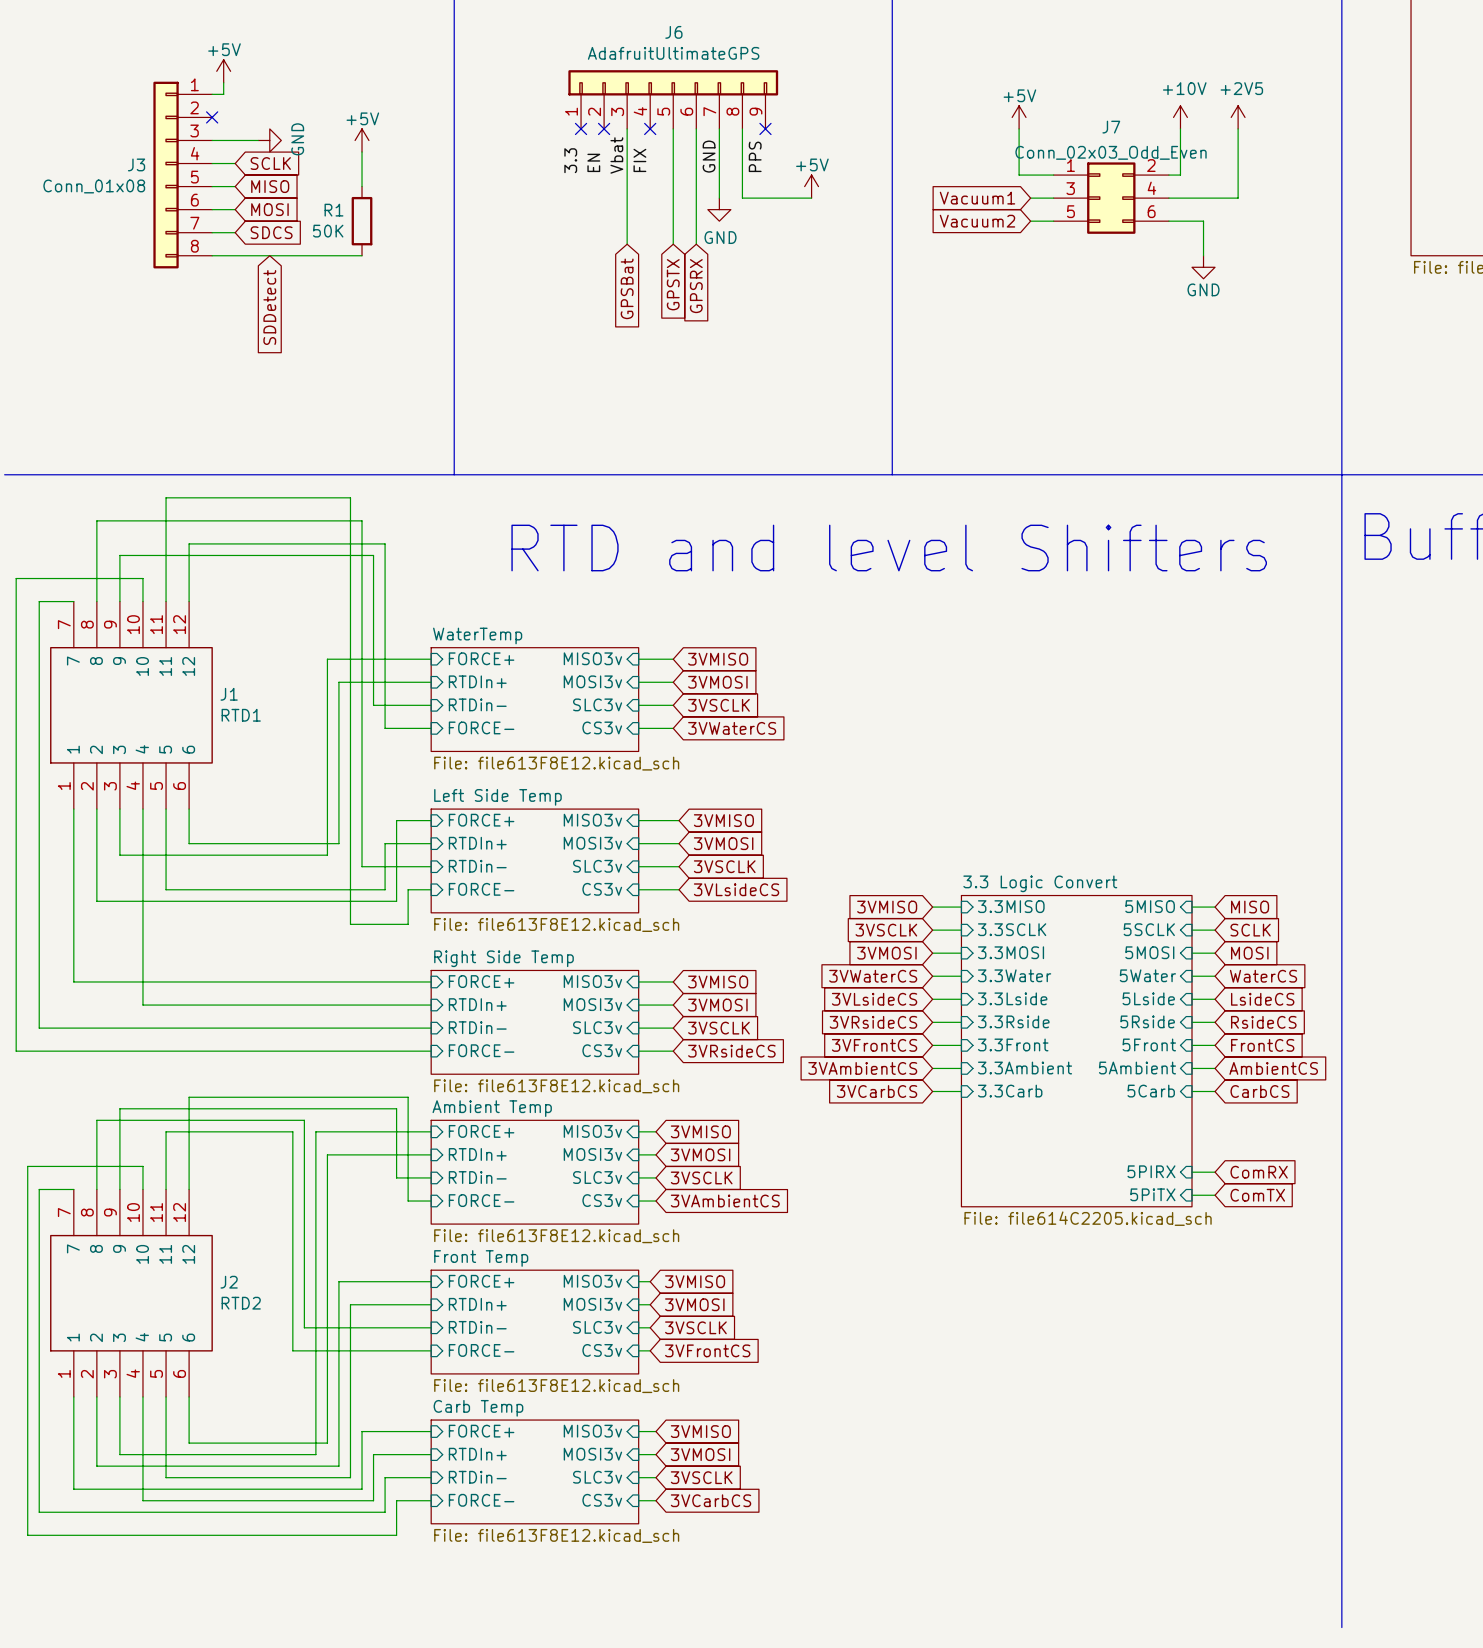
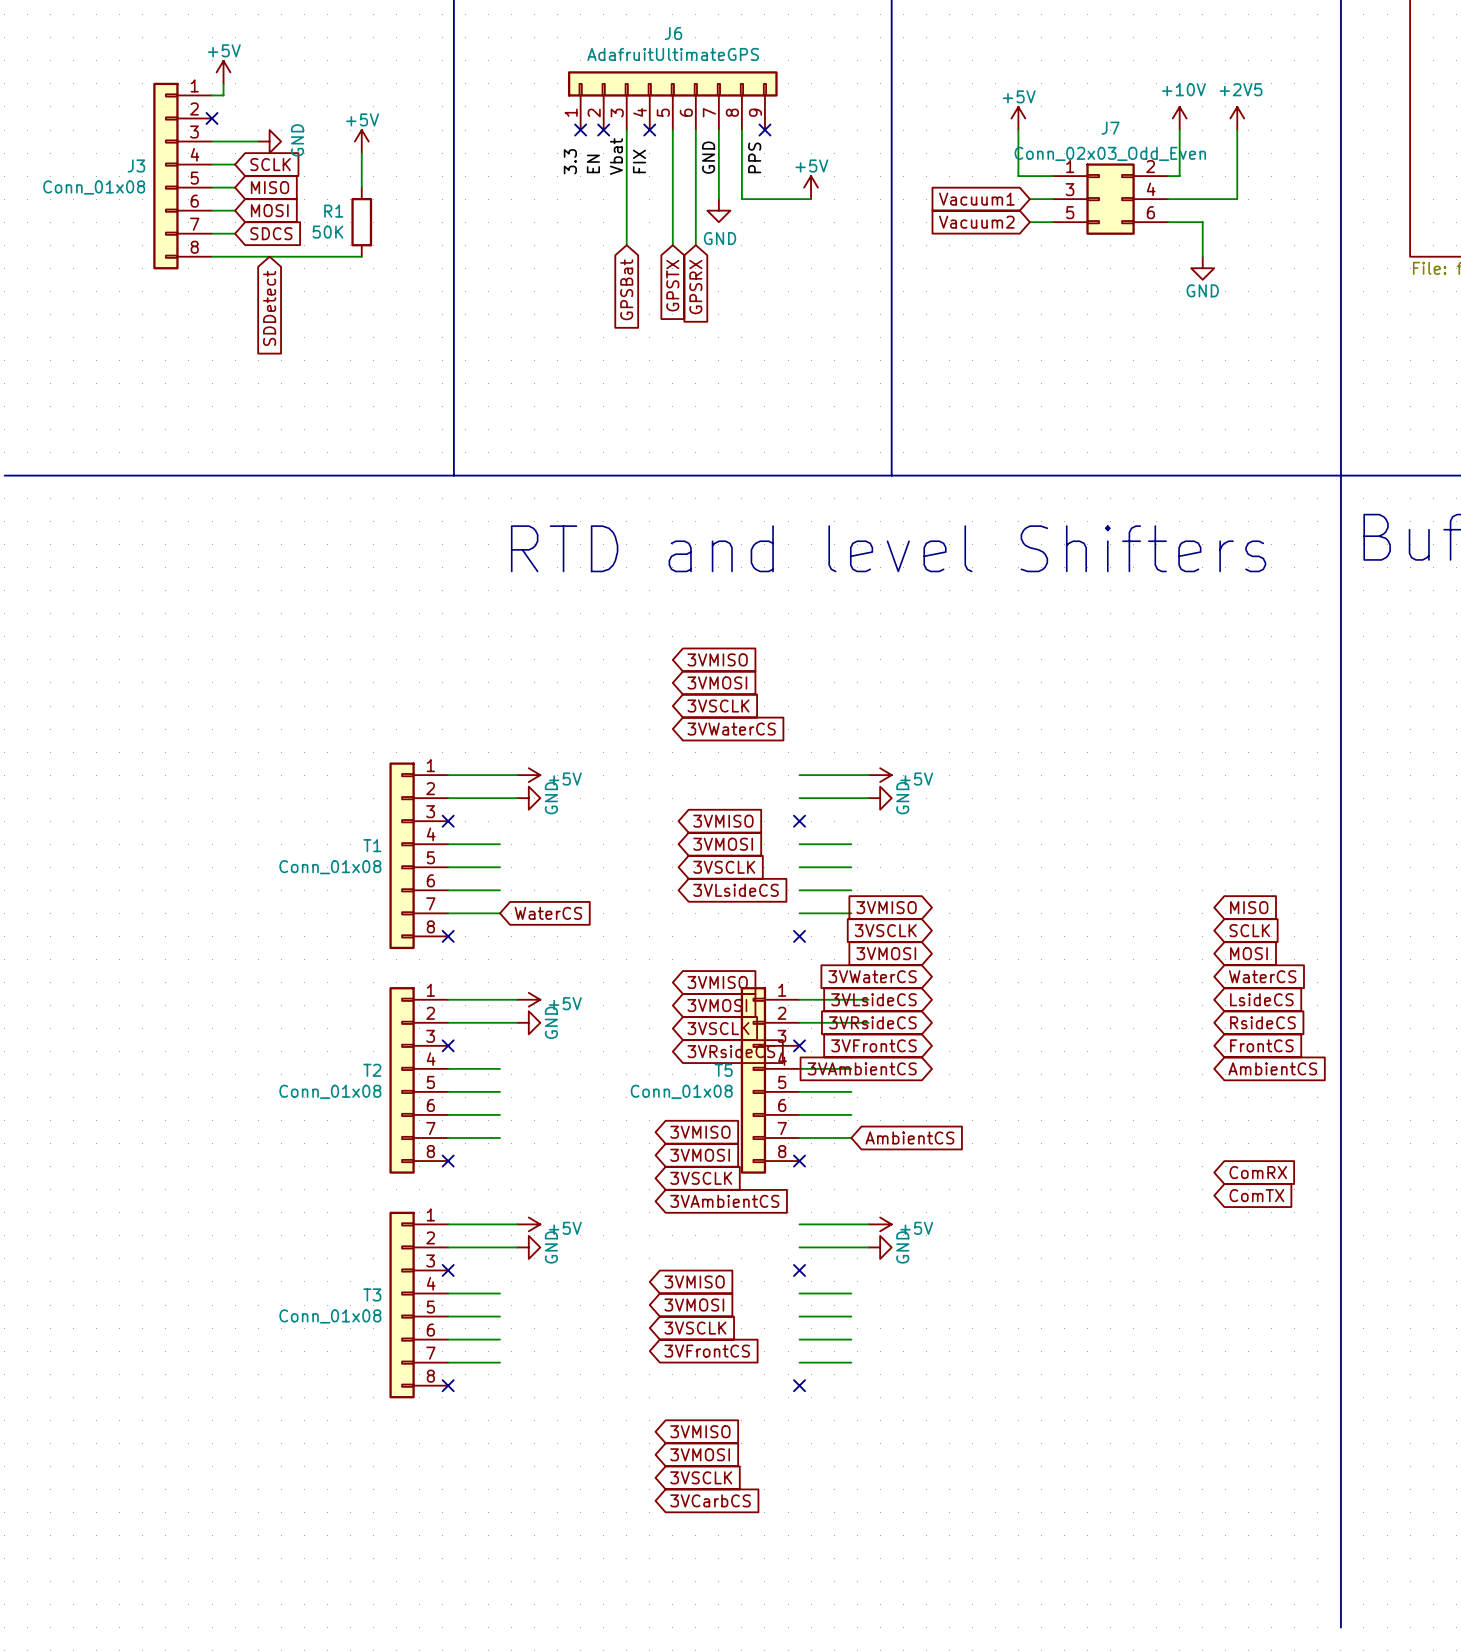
wire: (73, 601) (39, 601) (39, 1028) (431, 1028) -> none
wire: (96, 601) (96, 520) (362, 520) (362, 866) (431, 866) -> none
wire: (119, 601) (119, 555) (373, 555) (373, 705) (431, 705) -> none
wire: (142, 601) (142, 578) (16, 578) (16, 1051) (431, 1051) -> none
wire: (166, 601) (166, 497) (350, 497) (350, 924) (408, 924) (408, 889) (431, 889) -> none
wire: (189, 601) (189, 543) (385, 543) (385, 728) (431, 728) -> none
sheet pin: FORCE+ (481, 658) -> none
sheet pin: MISO3v (592, 658) -> none
wire: (431, 659) (327, 659) (327, 855) (119, 855) (119, 809) -> none
wire: (638, 659) (673, 659) -> none
sheet pin: RTDIn+ (477, 681) -> none
sheet pin: MOSI3v (592, 681) -> none
wire: (431, 682) (338, 682) (338, 843) (189, 843) (189, 809) -> none
wire: (638, 682) (673, 682) -> none
sheet WaterTemp: File: file613F8E12.kicad_sch (534, 699) -> none
sheet pin: RTDin- (477, 704) -> none
sheet pin: SLC3v (597, 704) -> none
J1: RTD1 (131, 705) -> none
wire: (638, 705) (673, 705) -> none
sheet pin: FORCE- (481, 727) -> none
sheet pin: CS3v (602, 727) -> none
wire: (638, 728) (673, 728) -> none
wire: none -> (448, 775) (517, 775)
power symbol: none -> +5V (528, 775)
wire: none -> (799, 775) (868, 775)
power symbol: none -> +5V (880, 775)
wire: none -> (448, 798) (517, 798)
power symbol: none -> GND (528, 798)
wire: none -> (799, 798) (868, 798)
power symbol: none -> GND (880, 798)
wire: (73, 809) (73, 981) (431, 981) -> none
wire: (96, 809) (96, 901) (396, 901) (396, 820) (431, 820) -> none
wire: (142, 809) (142, 1005) (431, 1005) -> none
wire: (166, 809) (166, 889) (385, 889) (385, 843) (431, 843) -> none
no-connect mark: none -> (448, 821)
sheet pin: FORCE+ (481, 820) -> none
sheet pin: MISO3v (592, 820) -> none
wire: (638, 820) (679, 820) -> none
no-connect mark: none -> (799, 821)
wire: none -> (448, 844) (500, 844)
sheet pin: RTDIn+ (477, 843) -> none
sheet pin: MOSI3v (592, 843) -> none
wire: (638, 843) (679, 843) -> none
wire: none -> (799, 844) (851, 844)
T1: none -> Conn_01x08 (418, 855)
sheet Left Side Temp: File: file613F8E12.kicad_sch (534, 860) -> none
wire: none -> (448, 867) (500, 867)
sheet pin: RTDin- (477, 866) -> none
sheet pin: SLC3v (597, 866) -> none
wire: (638, 866) (679, 866) -> none
wire: none -> (799, 867) (851, 867)
wire: none -> (448, 890) (500, 890)
sheet pin: FORCE- (481, 889) -> none
sheet pin: CS3v (602, 889) -> none
wire: (638, 889) (679, 889) -> none
wire: none -> (799, 890) (851, 890)
sheet pin: 3.3MISO (1011, 906) -> none
sheet pin: 5MISO (1150, 906) -> none
wire: (932, 907) (961, 907) -> none
wire: (1191, 907) (1215, 907) -> none
global label: none -> WaterCS (548, 913)
wire: none -> (799, 913) (851, 913)
sheet pin: 3.3SCLK (1012, 929) -> none
sheet pin: 5SCLK (1149, 929) -> none
wire: (932, 930) (961, 930) -> none
wire: (1191, 930) (1215, 930) -> none
no-connect mark: none -> (448, 936)
no-connect mark: none -> (799, 936)
sheet pin: 3.3MOSI (1011, 952) -> none
sheet pin: 5MOSI (1149, 952) -> none
wire: (932, 953) (961, 953) -> none
wire: (1191, 953) (1215, 953) -> none
sheet pin: 3.3Water (1014, 975) -> none
sheet pin: 5Water (1147, 975) -> none
wire: (932, 976) (961, 976) -> none
wire: (1191, 976) (1215, 976) -> none
sheet pin: FORCE+ (481, 981) -> none
sheet pin: MISO3v (592, 981) -> none
wire: (638, 981) (673, 981) -> none
sheet pin: 3.3Lside (1012, 998) -> none
sheet pin: 5Lside (1148, 998) -> none
wire: none -> (448, 999) (517, 999)
power symbol: none -> +5V (528, 999)
wire: none -> (799, 999) (868, 999)
wire: (932, 999) (961, 999) -> none
wire: (1191, 999) (1215, 999) -> none
sheet pin: RTDIn+ (477, 1004) -> none
sheet pin: MOSI3v (592, 1004) -> none
wire: (638, 1005) (673, 1005) -> none
sheet pin: 3.3Rside (1013, 1021) -> none
sheet pin: 5Rside (1147, 1021) -> none
wire: none -> (448, 1022) (517, 1022)
power symbol: none -> GND (528, 1022)
sheet Right Side Temp: File: file613F8E12.kicad_sch (534, 1022) -> none
wire: none -> (799, 1022) (868, 1022)
wire: (932, 1022) (961, 1022) -> none
wire: (1191, 1022) (1215, 1022) -> none
sheet pin: RTDin- (477, 1027) -> none
sheet pin: SLC3v (597, 1027) -> none
wire: (638, 1028) (673, 1028) -> none
sheet pin: 3.3Front (1013, 1044) -> none
sheet pin: 5Front (1149, 1044) -> none
no-connect mark: none -> (448, 1045)
no-connect mark: none -> (799, 1045)
wire: (932, 1045) (961, 1045) -> none
wire: (1191, 1045) (1215, 1045) -> none
sheet pin: FORCE- (481, 1050) -> none
sheet pin: CS3v (602, 1050) -> none
wire: (638, 1051) (673, 1051) -> none
sheet 3.3 Logic Convert: File: file614C2205.kicad_sch (1076, 1051) -> none
wire: none -> (448, 1068) (500, 1068)
wire: none -> (799, 1068) (851, 1068)
wire: (932, 1068) (961, 1068) -> none
sheet pin: 3.3Ambient (1025, 1068) -> none
sheet pin: 5Ambient (1137, 1068) -> none
wire: (1191, 1068) (1215, 1068) -> none
T2: none -> Conn_01x08 (418, 1080)
T5: none -> Conn_01x08 (770, 1080)
wire: none -> (448, 1091) (500, 1091)
wire: none -> (799, 1091) (851, 1091)
global label: 3VCarbCS (877, 1091) -> none
wire: (932, 1091) (961, 1091) -> none
sheet pin: 3.3Carb (1010, 1091) -> none
sheet pin: 5Carb (1151, 1091) -> none
wire: (1191, 1091) (1215, 1091) -> none
global label: CarbCS (1259, 1091) -> none
wire: none -> (448, 1114) (500, 1114)
wire: none -> (799, 1114) (851, 1114)
wire: (431, 1131) (315, 1131) (315, 1454) (119, 1454) (119, 1396) -> none
sheet pin: FORCE+ (481, 1131) -> none
sheet pin: MISO3v (592, 1131) -> none
wire: (638, 1131) (655, 1131) -> none
wire: none -> (448, 1138) (500, 1138)
wire: none -> (799, 1138) (851, 1138)
global label: none -> AmbientCS (909, 1138)
wire: (431, 1154) (327, 1154) (327, 1443) (189, 1443) (189, 1396) -> none
sheet pin: RTDIn+ (477, 1154) -> none
sheet pin: MOSI3v (592, 1154) -> none
wire: (638, 1154) (655, 1154) -> none
no-connect mark: none -> (448, 1161)
no-connect mark: none -> (799, 1161)
sheet pin: 5PIRX (1151, 1171) -> none
sheet Ambient Temp: File: file613F8E12.kicad_sch (534, 1172) -> none
wire: (1191, 1172) (1215, 1172) -> none
wire: (431, 1177) (396, 1177) (396, 1108) (119, 1108) (119, 1189) -> none
sheet pin: RTDin- (477, 1177) -> none
sheet pin: SLC3v (597, 1177) -> none
wire: (638, 1177) (655, 1177) -> none
wire: (73, 1189) (39, 1189) (39, 1512) (385, 1512) (385, 1477) (431, 1477) -> none
wire: (96, 1189) (96, 1120) (304, 1120) (304, 1327) (431, 1327) -> none
wire: (142, 1189) (142, 1166) (27, 1166) (27, 1535) (396, 1535) (396, 1500) (431, 1500) -> none
wire: (166, 1189) (166, 1131) (292, 1131) (292, 1350) (431, 1350) -> none
wire: (189, 1189) (189, 1097) (408, 1097) (408, 1201) (431, 1201) -> none
sheet pin: 5PiTX (1152, 1194) -> none
wire: (1191, 1195) (1215, 1195) -> none
sheet pin: FORCE- (481, 1200) -> none
sheet pin: CS3v (602, 1200) -> none
wire: (638, 1201) (655, 1201) -> none
power symbol: none -> +5V (528, 1224)
wire: none -> (799, 1224) (868, 1224)
power symbol: none -> +5V (880, 1224)
wire: none -> (448, 1247) (517, 1247)
power symbol: none -> GND (528, 1247)
wire: none -> (799, 1247) (868, 1247)
power symbol: none -> GND (880, 1247)
no-connect mark: none -> (448, 1270)
no-connect mark: none -> (799, 1270)
wire: (431, 1281) (338, 1281) (338, 1466) (96, 1466) (96, 1396) -> none
sheet pin: FORCE+ (481, 1281) -> none
sheet pin: MISO3v (592, 1281) -> none
wire: (638, 1281) (650, 1281) -> none
J2: RTD2 (131, 1293) -> none
wire: none -> (448, 1293) (500, 1293)
wire: none -> (799, 1293) (851, 1293)
T3: none -> Conn_01x08 (418, 1305)
wire: (431, 1304) (350, 1304) (350, 1477) (166, 1477) (166, 1396) -> none
sheet pin: RTDIn+ (477, 1304) -> none
sheet pin: MOSI3v (592, 1304) -> none
wire: (638, 1304) (650, 1304) -> none
wire: none -> (448, 1316) (500, 1316)
wire: none -> (799, 1316) (851, 1316)
sheet Front Temp: File: file613F8E12.kicad_sch (534, 1322) -> none
sheet pin: RTDin- (477, 1327) -> none
sheet pin: SLC3v (597, 1327) -> none
wire: (638, 1327) (650, 1327) -> none
wire: none -> (448, 1339) (500, 1339)
wire: none -> (799, 1339) (851, 1339)
sheet pin: FORCE- (481, 1350) -> none
sheet pin: CS3v (602, 1350) -> none
wire: (638, 1350) (650, 1350) -> none
wire: none -> (448, 1362) (500, 1362)
wire: none -> (799, 1362) (851, 1362)
no-connect mark: none -> (448, 1385)
no-connect mark: none -> (799, 1385)
wire: (73, 1396) (73, 1489) (362, 1489) (362, 1431) (431, 1431) -> none
wire: (142, 1396) (142, 1500) (373, 1500) (373, 1454) (431, 1454) -> none
sheet pin: FORCE+ (481, 1431) -> none
sheet pin: MISO3v (592, 1431) -> none
wire: (638, 1431) (655, 1431) -> none
sheet pin: RTDIn+ (477, 1454) -> none
sheet pin: MOSI3v (592, 1454) -> none
wire: (638, 1454) (655, 1454) -> none
sheet Carb Temp: File: file613F8E12.kicad_sch (534, 1471) -> none
sheet pin: RTDin- (477, 1477) -> none
sheet pin: SLC3v (597, 1477) -> none
wire: (638, 1477) (655, 1477) -> none
sheet pin: FORCE- (481, 1500) -> none
sheet pin: CS3v (602, 1500) -> none
wire: (638, 1500) (655, 1500) -> none

